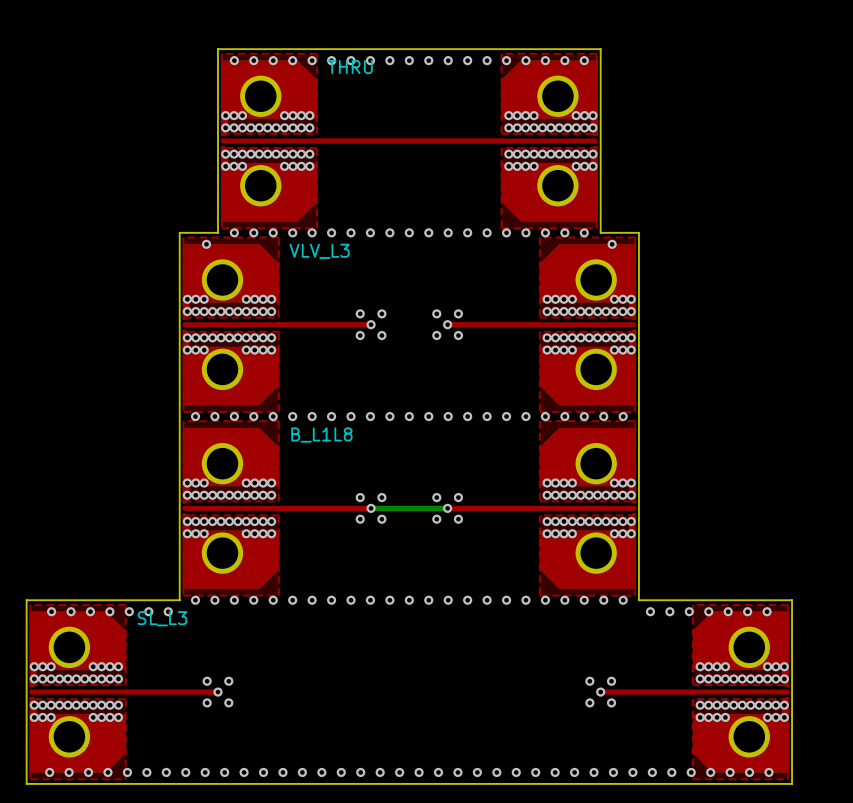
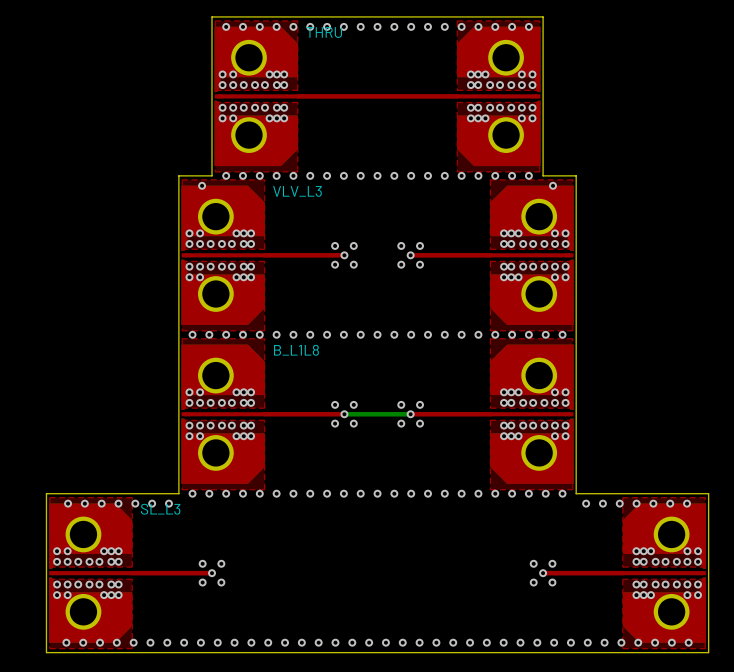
via: (225, 115) -> none
via: none -> (222, 74)
via: (234, 115) -> none
via: (309, 115) -> none
via: (508, 115) -> none
via: (584, 115) -> none
via: none -> (532, 74)
via: (593, 115) -> none
via: (225, 127) -> none
via: none -> (222, 85)
via: (234, 127) -> none
via: (250, 127) -> none
via: none -> (243, 85)
via: (259, 127) -> none
via: (276, 127) -> none
via: none -> (264, 85)
via: (284, 127) -> none
via: (309, 127) -> none
via: (508, 127) -> none
via: (534, 127) -> none
via: none -> (490, 85)
via: (542, 127) -> none
via: (559, 127) -> none
via: none -> (511, 85)
via: (567, 127) -> none
via: (584, 127) -> none
via: none -> (532, 85)
via: (593, 127) -> none
via: (225, 154) -> none
via: none -> (222, 107)
via: (234, 154) -> none
via: (250, 154) -> none
via: none -> (243, 107)
via: (259, 154) -> none
via: (276, 154) -> none
via: none -> (264, 107)
via: (284, 154) -> none
via: (309, 154) -> none
via: (508, 154) -> none
via: (534, 154) -> none
via: none -> (490, 107)
via: (542, 154) -> none
via: (559, 154) -> none
via: none -> (511, 107)
via: (567, 154) -> none
via: (584, 154) -> none
via: none -> (532, 107)
via: (593, 154) -> none
via: (225, 166) -> none
via: none -> (222, 118)
via: (234, 166) -> none
via: (309, 166) -> none
via: (508, 166) -> none
via: (584, 166) -> none
via: none -> (532, 118)
via: (593, 166) -> none
via: (187, 299) -> none
via: none -> (189, 233)
via: (195, 299) -> none
via: (271, 299) -> none
via: (547, 299) -> none
via: (622, 299) -> none
via: none -> (565, 233)
via: (631, 299) -> none
via: (187, 311) -> none
via: none -> (189, 243)
via: (195, 311) -> none
via: (212, 311) -> none
via: none -> (210, 243)
via: (221, 311) -> none
via: (237, 311) -> none
via: none -> (231, 243)
via: (246, 311) -> none
via: (271, 311) -> none
via: (547, 311) -> none
via: (572, 311) -> none
via: none -> (523, 243)
via: (580, 311) -> none
via: (597, 311) -> none
via: none -> (544, 243)
via: (606, 311) -> none
via: (622, 311) -> none
via: none -> (565, 243)
via: (631, 311) -> none
via: (187, 337) -> none
via: none -> (189, 266)
via: (195, 337) -> none
via: (212, 337) -> none
via: none -> (210, 266)
via: (221, 337) -> none
via: (237, 337) -> none
via: none -> (231, 266)
via: (246, 337) -> none
via: (271, 337) -> none
via: (547, 337) -> none
via: (572, 337) -> none
via: none -> (523, 266)
via: (580, 337) -> none
via: (597, 337) -> none
via: none -> (544, 266)
via: (606, 337) -> none
via: (622, 337) -> none
via: none -> (565, 266)
via: (631, 337) -> none
via: (187, 350) -> none
via: none -> (189, 277)
via: (195, 350) -> none
via: (271, 350) -> none
via: (547, 350) -> none
via: (622, 350) -> none
via: none -> (565, 277)
via: (631, 350) -> none
via: (187, 483) -> none
via: none -> (189, 392)
via: (195, 483) -> none
via: (271, 483) -> none
via: (547, 483) -> none
via: (622, 483) -> none
via: none -> (565, 392)
via: (631, 483) -> none
via: (187, 495) -> none
via: none -> (189, 402)
via: (195, 495) -> none
via: (212, 495) -> none
via: none -> (210, 402)
via: (221, 495) -> none
via: (237, 495) -> none
via: none -> (231, 402)
via: (246, 495) -> none
via: (271, 495) -> none
via: (547, 495) -> none
via: (572, 495) -> none
via: none -> (523, 402)
via: (580, 495) -> none
via: (597, 495) -> none
via: none -> (544, 402)
via: (606, 495) -> none
via: (622, 495) -> none
via: none -> (565, 402)
via: (631, 495) -> none
via: (187, 521) -> none
via: none -> (189, 425)
via: (195, 521) -> none
via: (212, 521) -> none
via: none -> (210, 425)
via: (221, 521) -> none
via: (237, 521) -> none
via: none -> (231, 425)
via: (246, 521) -> none
via: (271, 521) -> none
via: (547, 521) -> none
via: (572, 521) -> none
via: none -> (523, 425)
via: (580, 521) -> none
via: (597, 521) -> none
via: none -> (544, 425)
via: (606, 521) -> none
via: (622, 521) -> none
via: none -> (565, 425)
via: (631, 521) -> none
via: (187, 533) -> none
via: none -> (189, 436)
via: (195, 533) -> none
via: (271, 533) -> none
via: (547, 533) -> none
via: (622, 533) -> none
via: none -> (565, 436)
via: (631, 533) -> none
via: (34, 666) -> none
via: none -> (57, 551)
via: (42, 666) -> none
via: (118, 666) -> none
via: (700, 666) -> none
via: (775, 666) -> none
via: none -> (698, 551)
via: (784, 666) -> none
via: (34, 678) -> none
via: none -> (57, 561)
via: (42, 678) -> none
via: (59, 678) -> none
via: none -> (78, 561)
via: (67, 678) -> none
via: (84, 678) -> none
via: none -> (99, 561)
via: (93, 678) -> none
via: (118, 678) -> none
via: (700, 678) -> none
via: (725, 678) -> none
via: none -> (655, 561)
via: (733, 678) -> none
via: (750, 678) -> none
via: none -> (676, 561)
via: (759, 678) -> none
via: (775, 678) -> none
via: none -> (698, 561)
via: (784, 678) -> none
via: (34, 705) -> none
via: none -> (57, 584)
via: (42, 705) -> none
via: (59, 705) -> none
via: none -> (78, 584)
via: (67, 705) -> none
via: (84, 705) -> none
via: none -> (99, 584)
via: (93, 705) -> none
via: (118, 705) -> none
via: (700, 705) -> none
via: (725, 705) -> none
via: none -> (655, 584)
via: (733, 705) -> none
via: (750, 705) -> none
via: none -> (676, 584)
via: (759, 705) -> none
via: (775, 705) -> none
via: none -> (698, 584)
via: (784, 705) -> none
via: (34, 717) -> none
via: none -> (57, 595)
via: (42, 717) -> none
via: (118, 717) -> none
via: (700, 717) -> none
via: (775, 717) -> none
via: none -> (698, 595)
via: (784, 717) -> none

